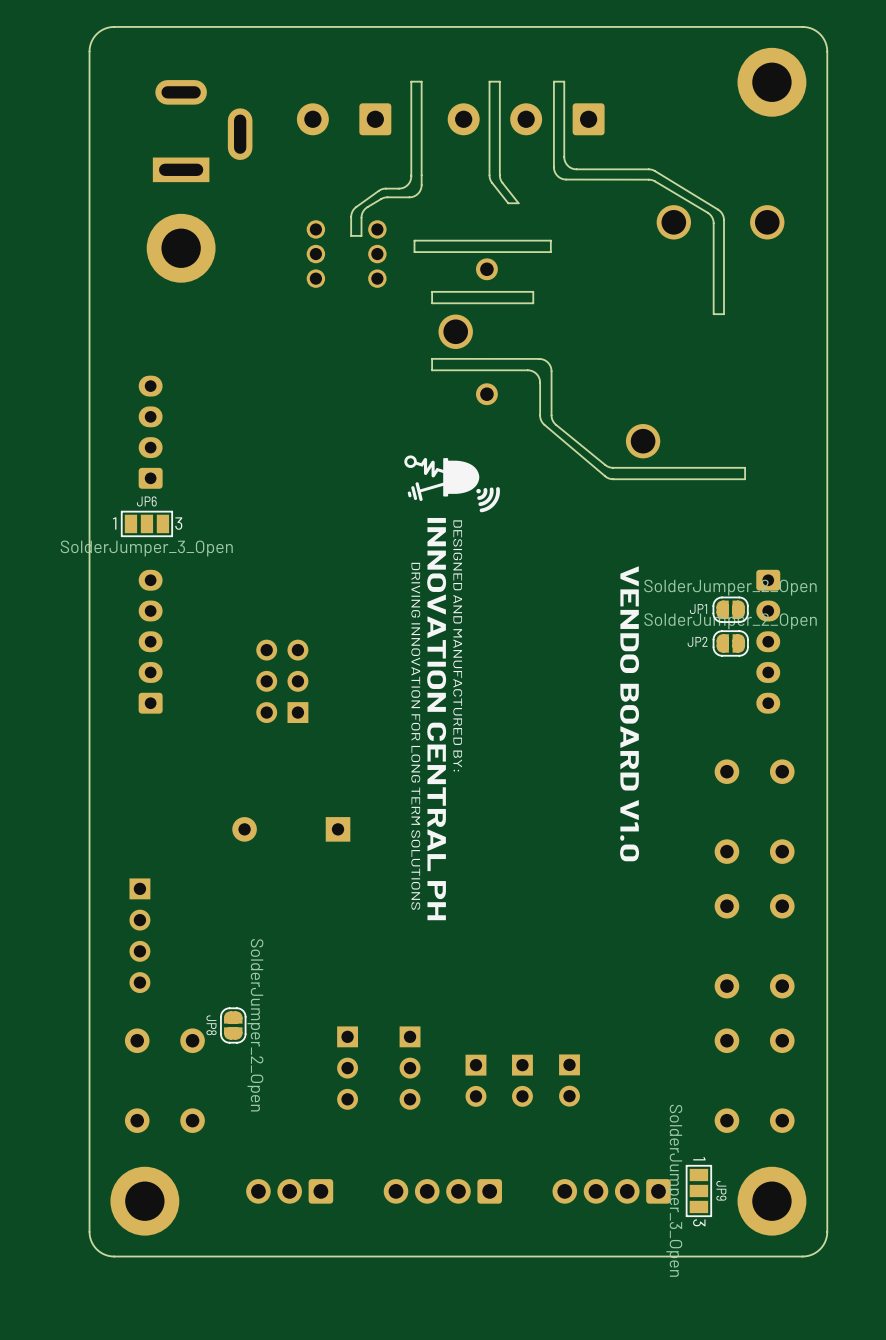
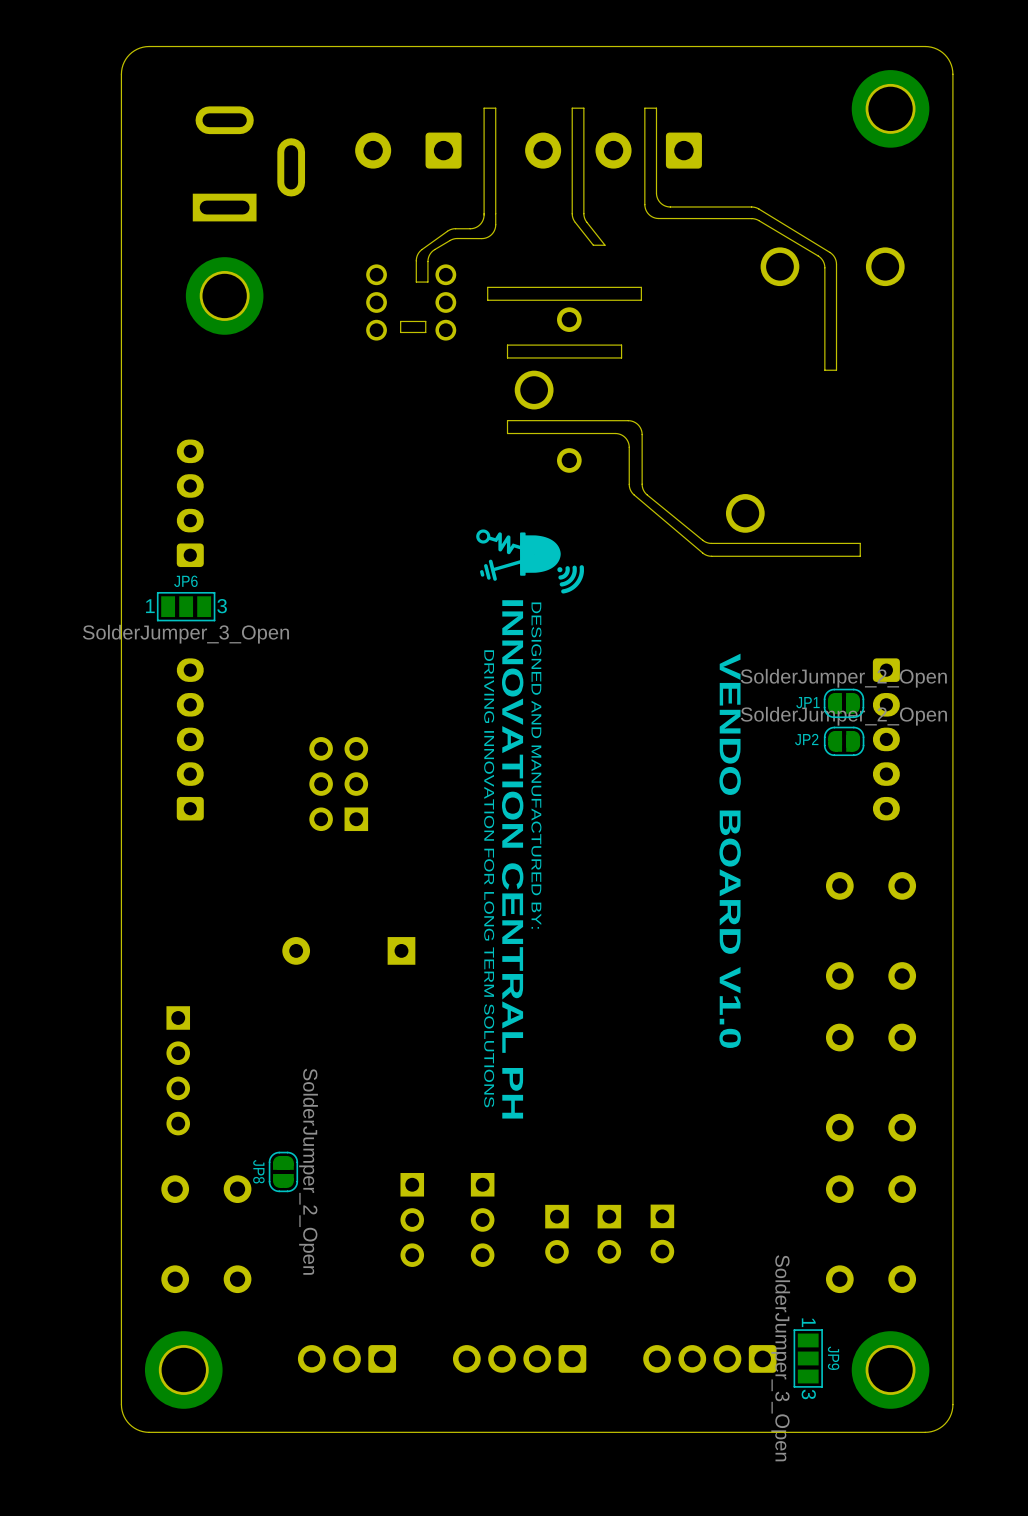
board edge: none -> (425, 321) (400, 321) (400, 332) (425, 332) (425, 321)

